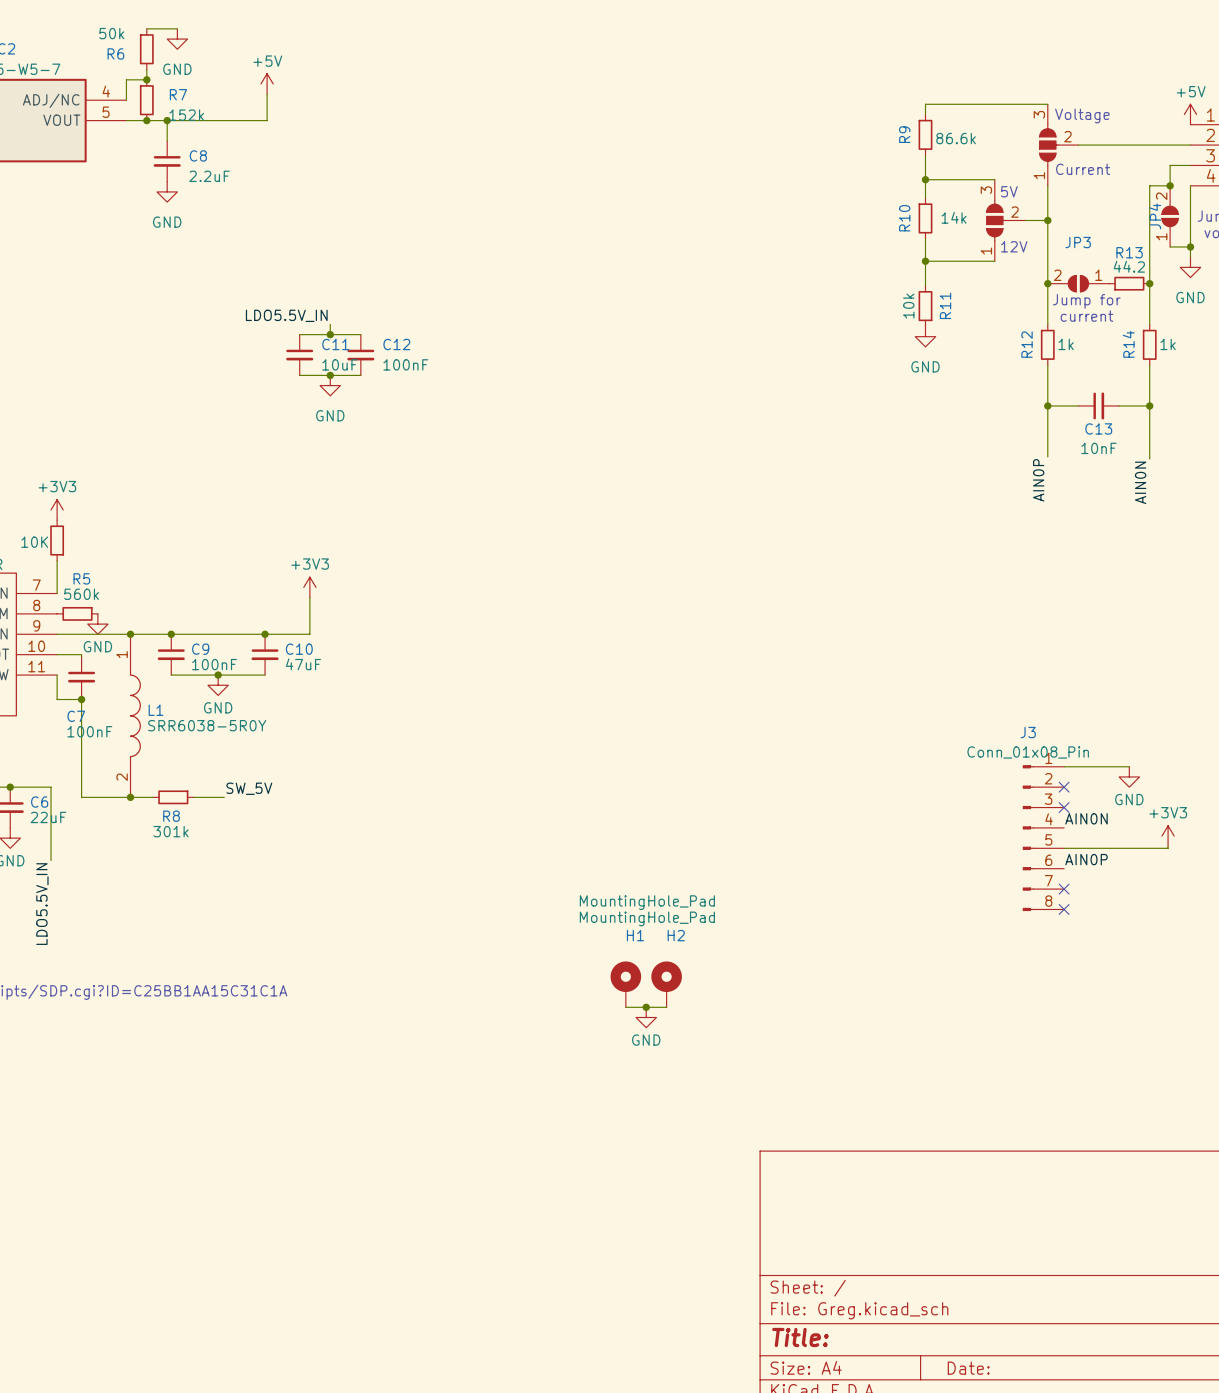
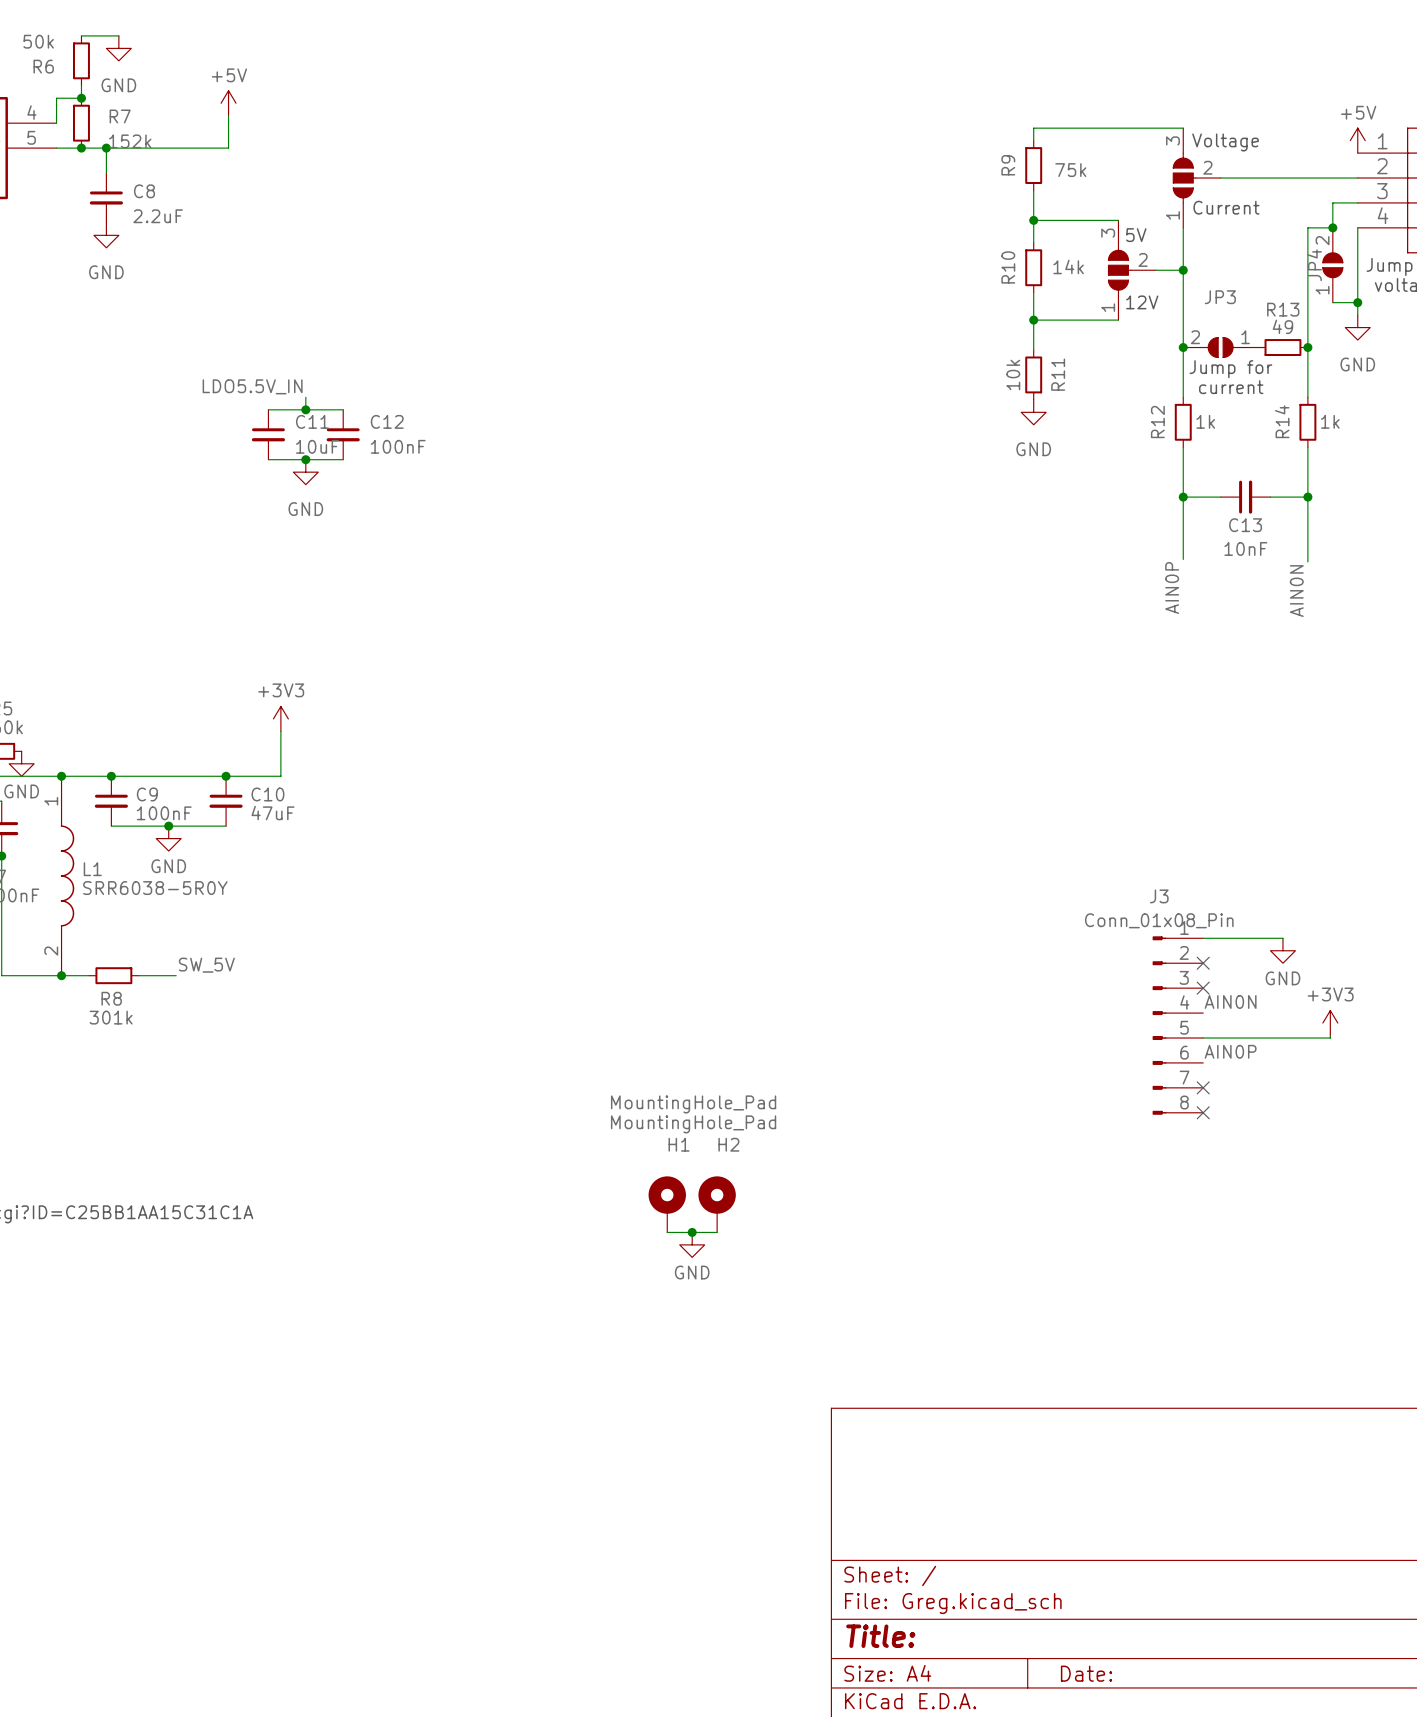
R9 value: 86.6k (956, 138) -> 75k (1070, 170)
R13 value: 44.2 (1129, 266) -> 49 (1282, 326)

